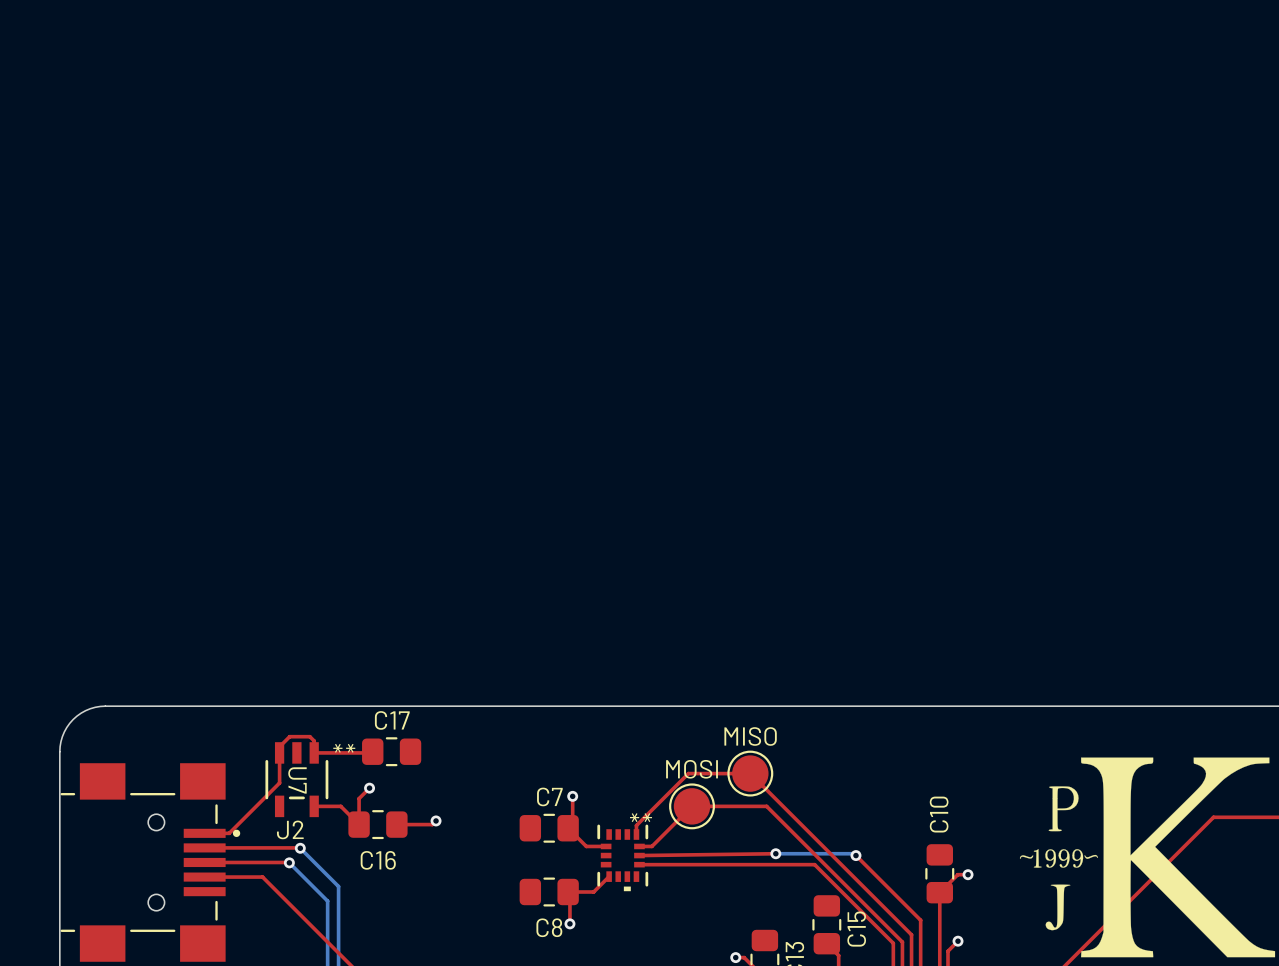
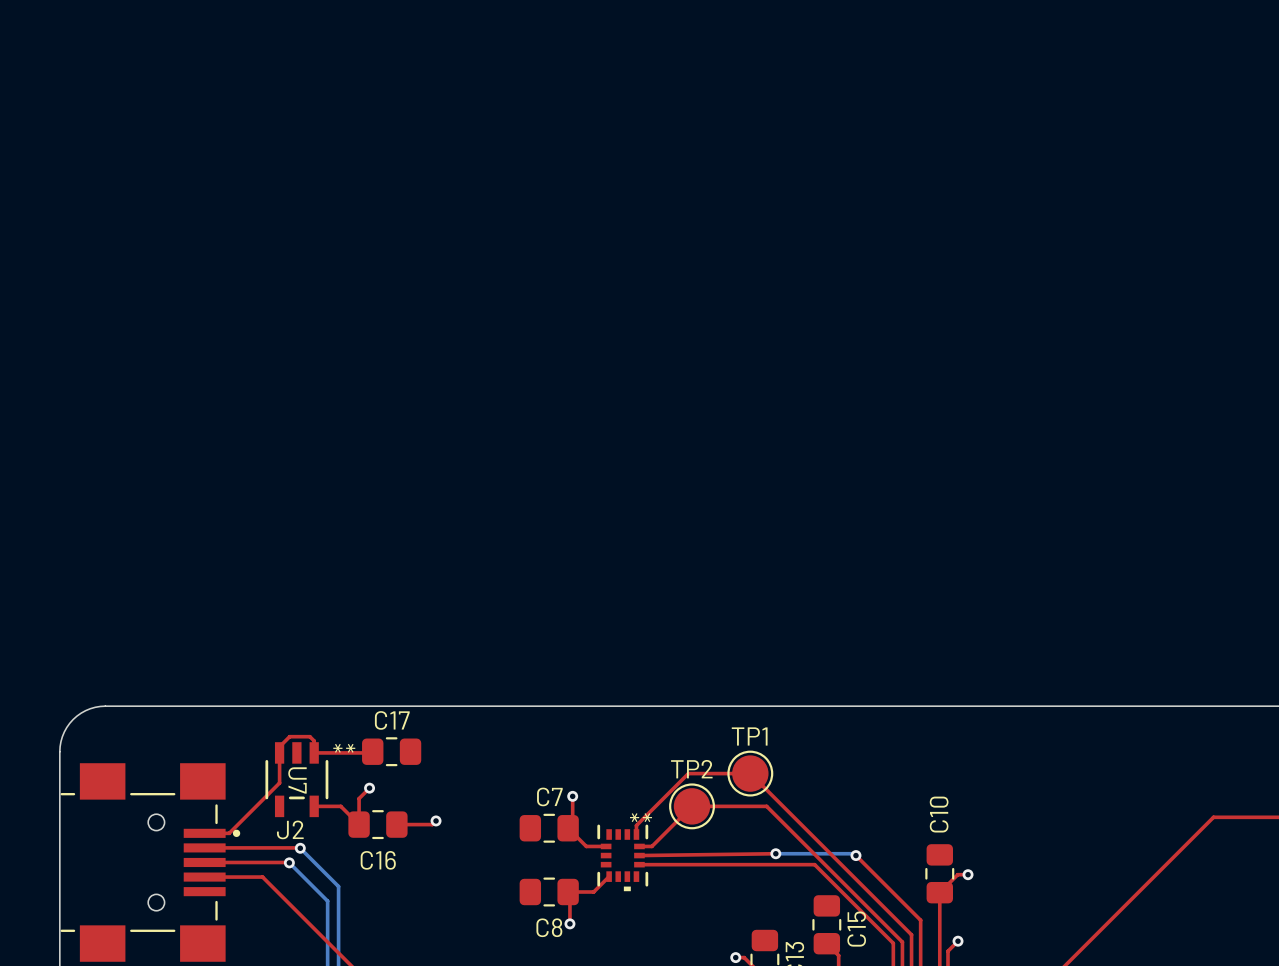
MISO name: MISO (750, 736) -> TP1 (749, 736)
drawing: [1019, 757, 1276, 958] -> none
MOSI name: MOSI (692, 769) -> TP2 (691, 769)

